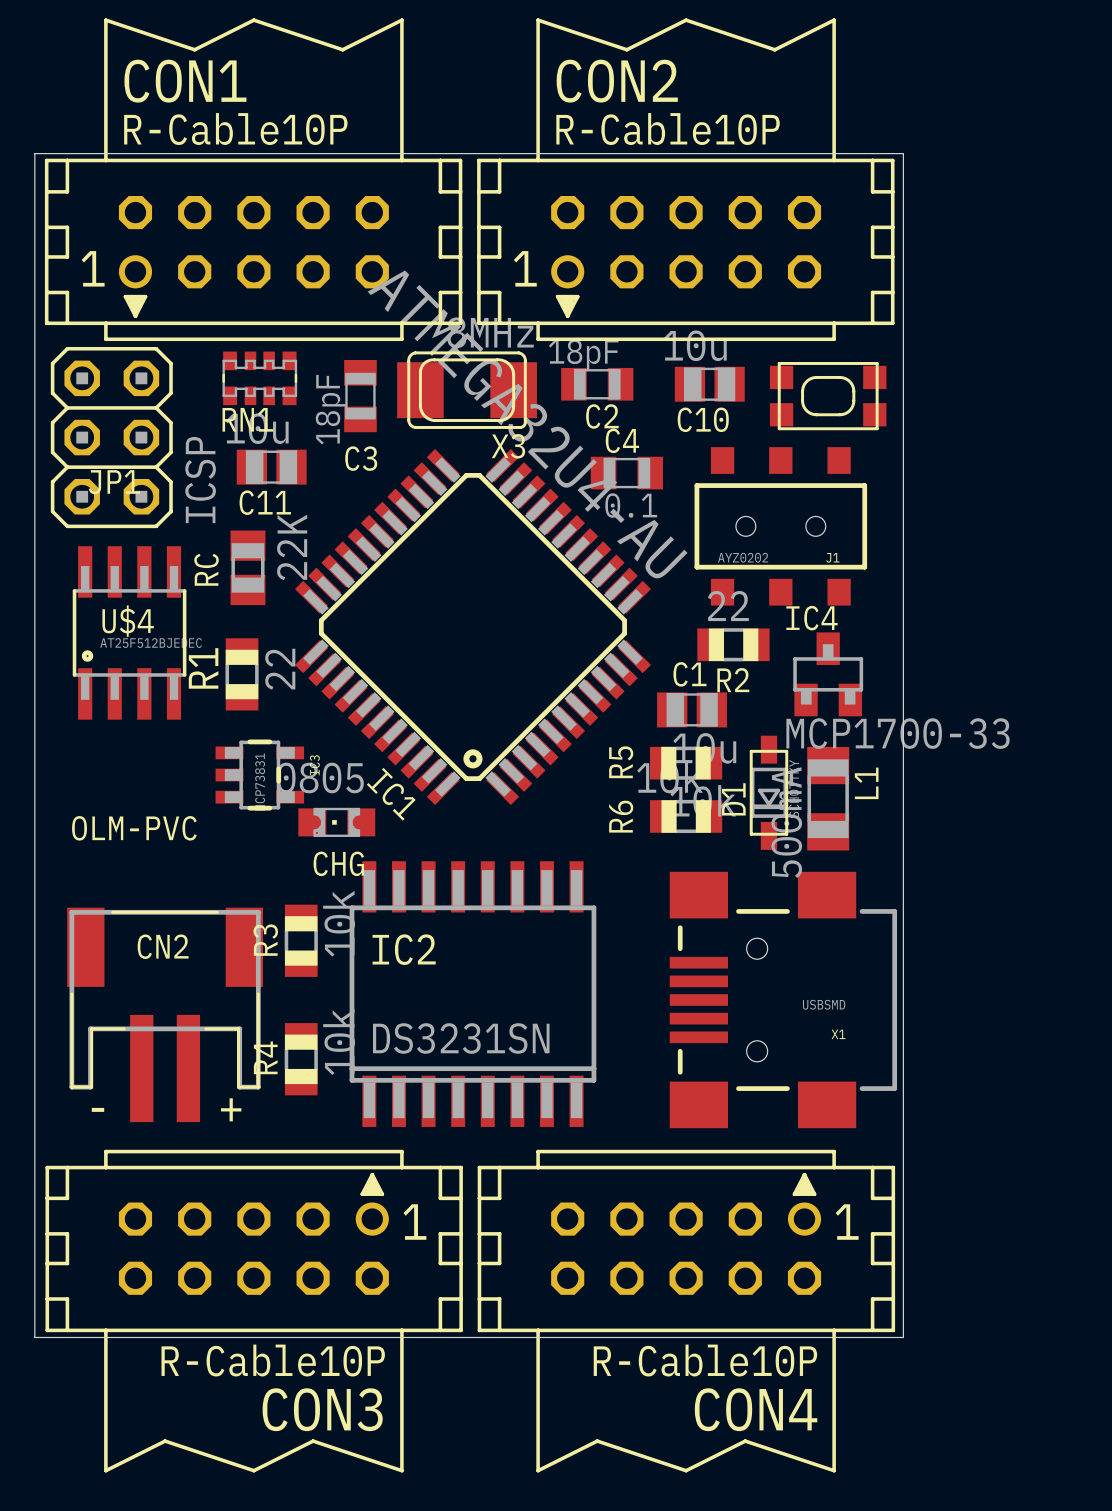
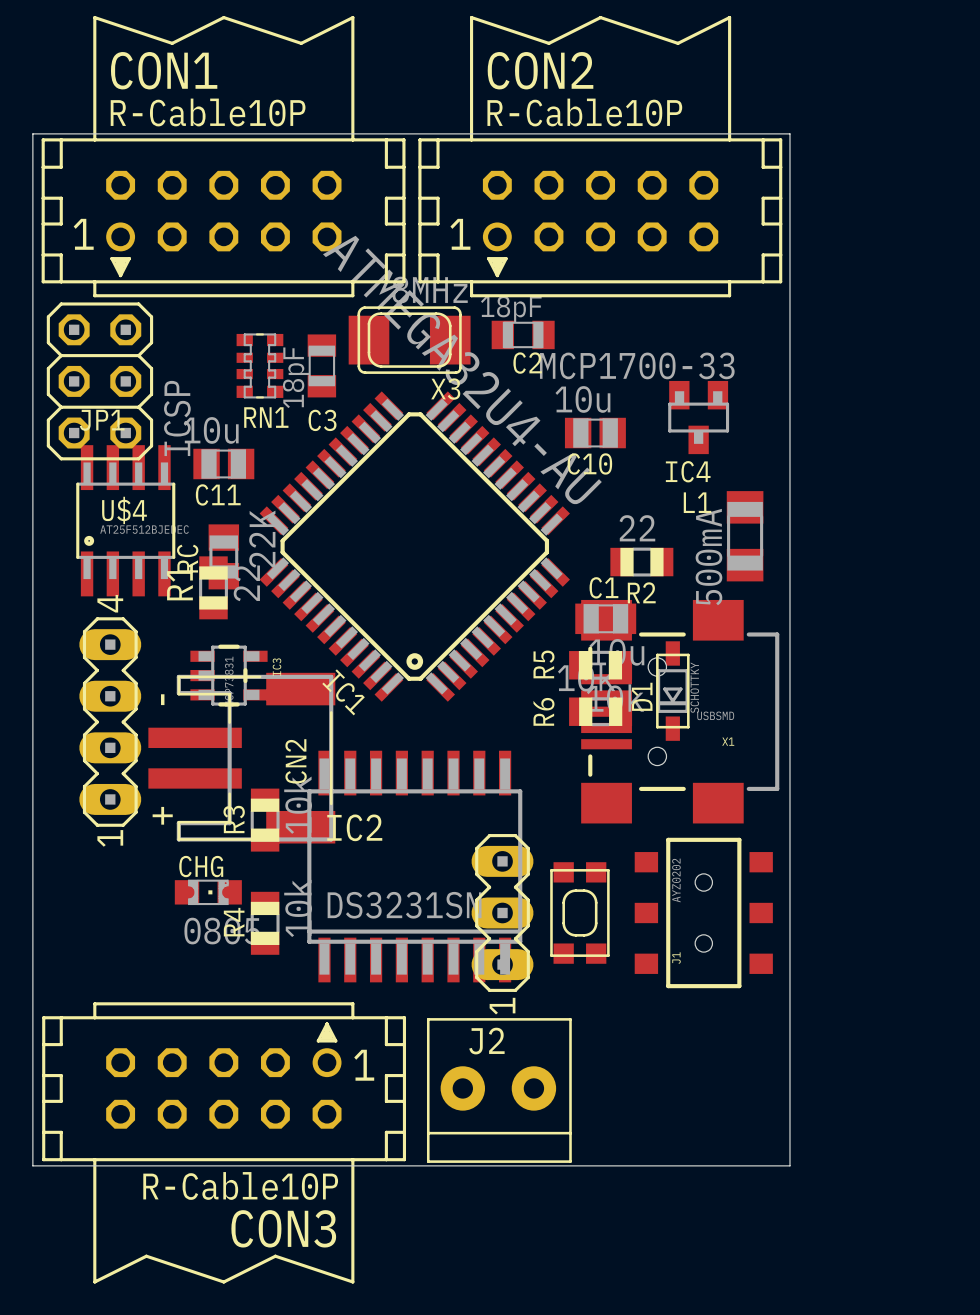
RN1 rotation: 0° (259, 378) -> 90° clockwise (259, 365)
RN1 position: (259, 378) -> (259, 365)
C10 position: (709, 384) -> (595, 433)
C3 position: (360, 396) -> (321, 365)
part: (828, 396) -> none
C11 position: (271, 467) -> (223, 463)
C4: 0.1 (626, 473) -> none
J1 rotation: 0° (780, 526) -> 90° clockwise (703, 912)
J1 position: (780, 526) -> (703, 912)
RC position: (247, 567) -> (223, 556)
U$4 position: (129, 632) -> (125, 520)
IC4 rotation: 0° (828, 674) -> 180° (698, 417)
IC4 position: (828, 674) -> (698, 417)
L1 name rotation: 0° (866, 783) -> 90° clockwise (697, 502)
L1 name position: L1 (866, 783) -> L1 (697, 502)
L1 position: (828, 798) -> (745, 536)
CHG rotation: 0° (336, 822) -> 180° (208, 892)
CHG position: (336, 822) -> (208, 892)
part: none -> (110, 722)
text: OLM-PVC (134, 828) -> none
CN2 footprint: [67, 907, 263, 1123] -> [148, 672, 336, 844]
CN2 name position: CN2 (163, 946) -> CN2 (296, 761)
X1 position: (783, 1000) -> (680, 711)
part: none -> (502, 912)
part: none -> (579, 912)
J2: none -> (499, 1090)
CON4: (686, 1311) -> none

